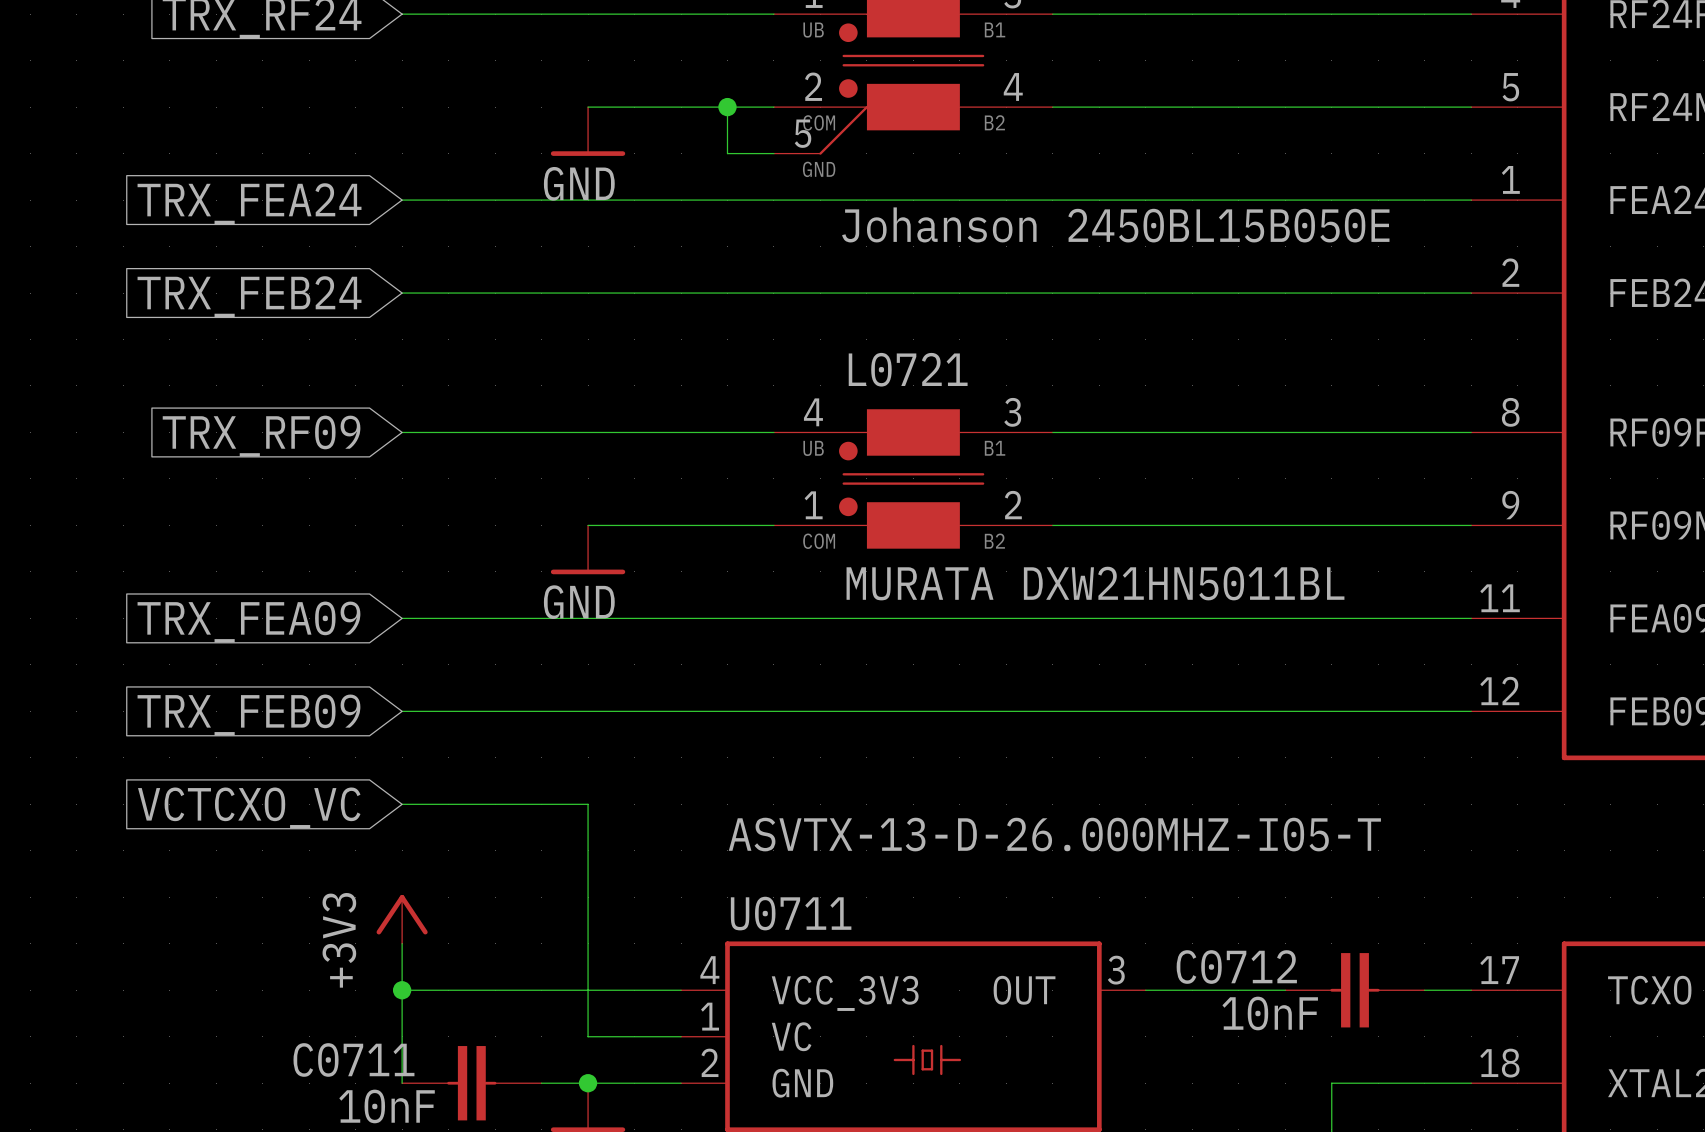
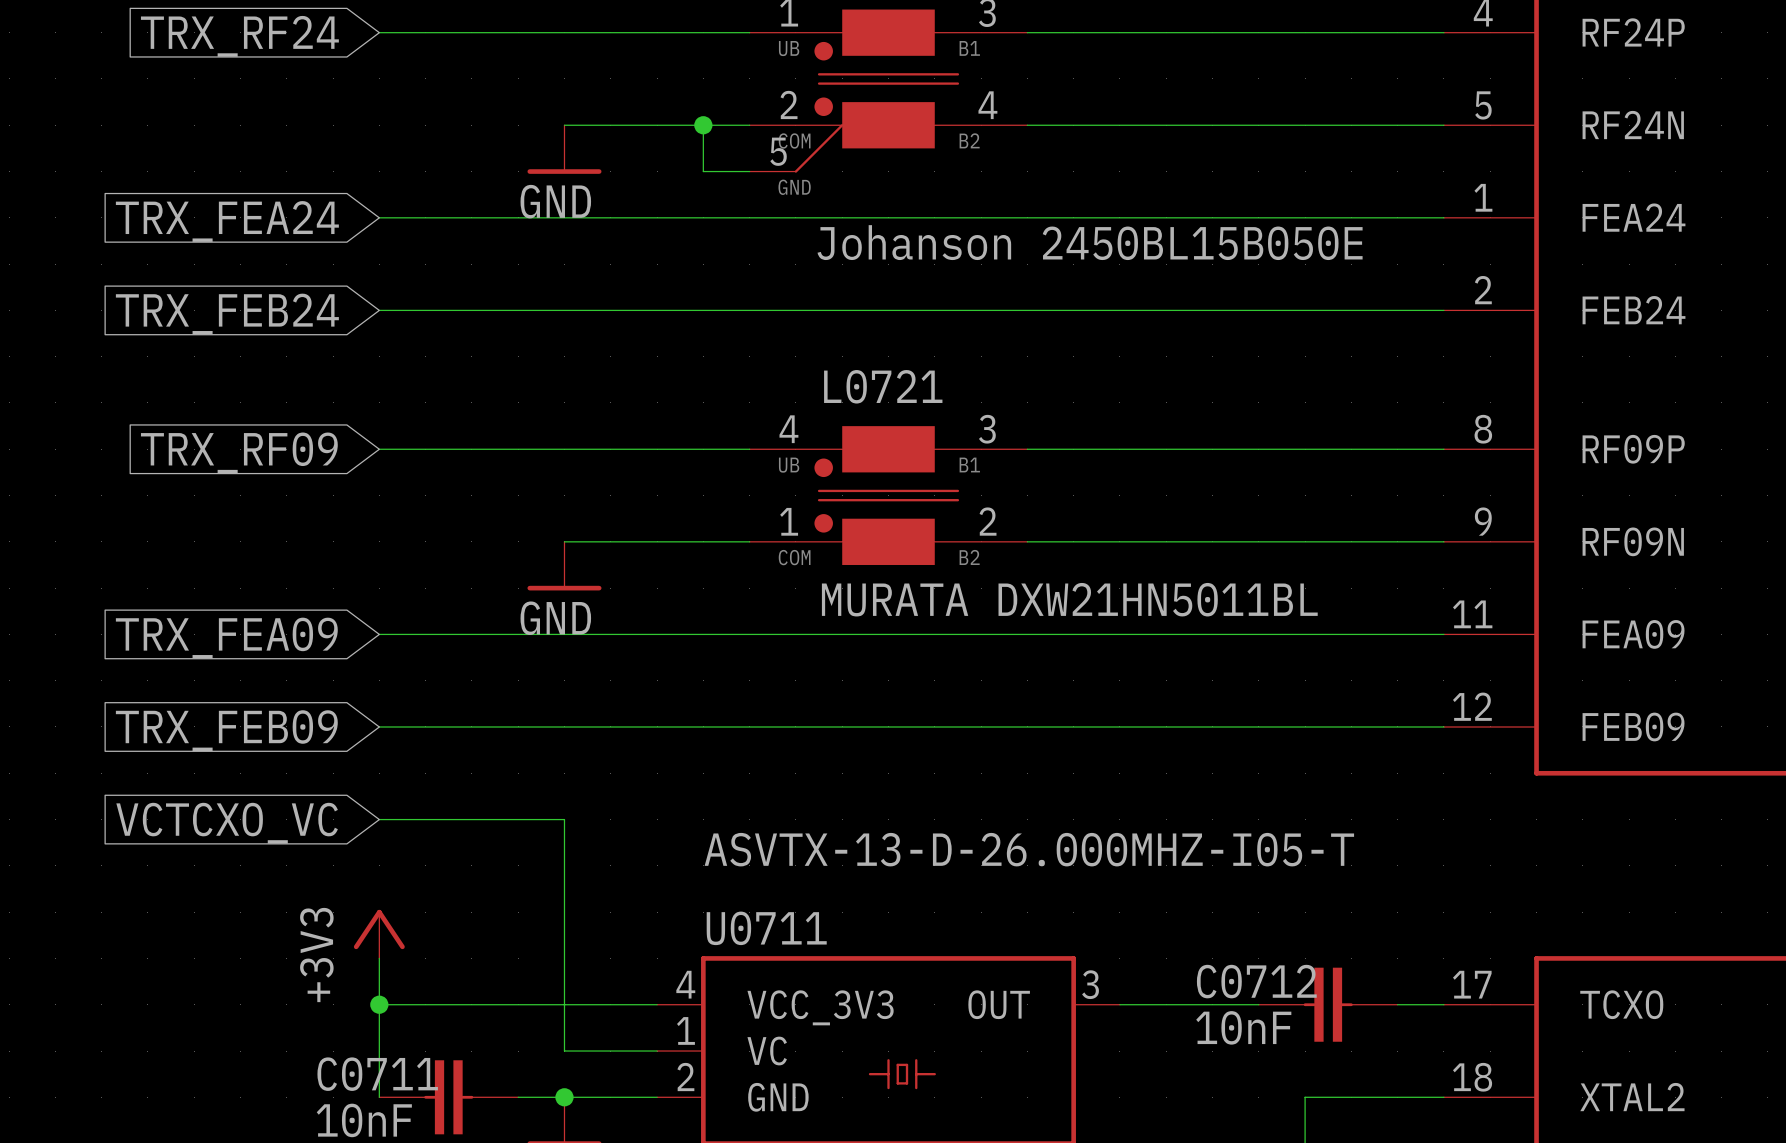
C0712 name position: C0712 (1236, 967) -> C0712 (1256, 981)
C0711 name position: C0711 (353, 1059) -> C0711 (377, 1074)

